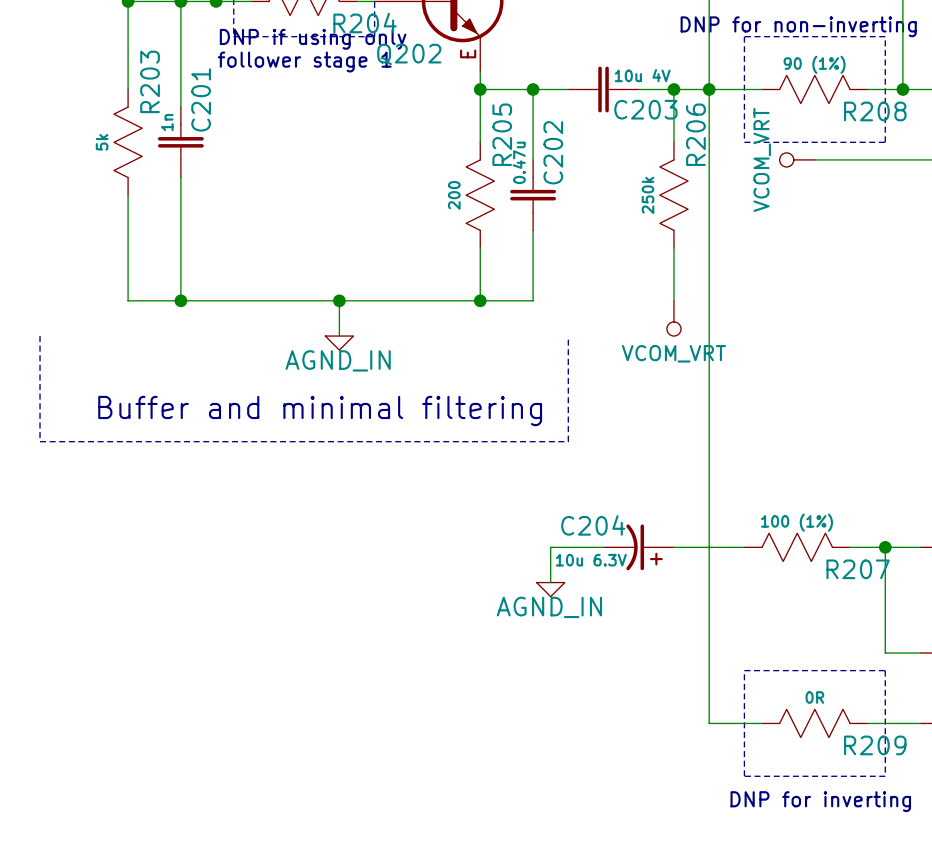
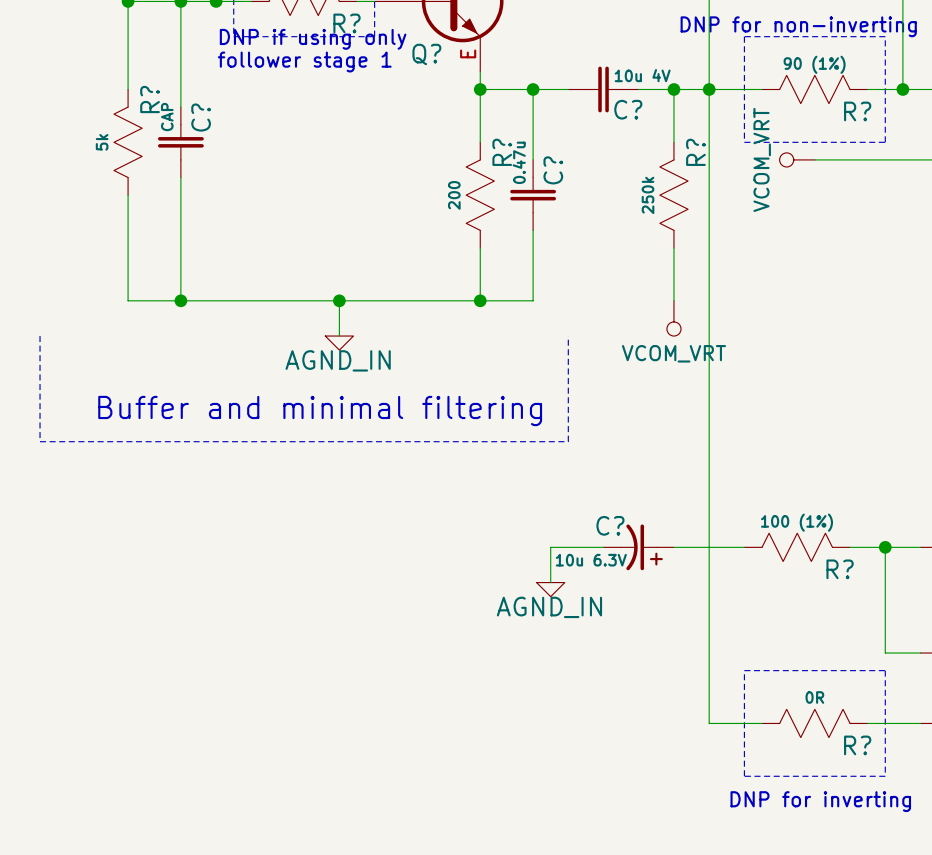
R204 name: R204 (365, 22) -> R? (346, 23)
Q202 name: Q202 (409, 54) -> Q? (426, 54)
R203 name: R203 (150, 81) -> R? (150, 99)
C201 name: C201 (201, 99) -> C? (201, 117)
C203 name: C203 (645, 109) -> C? (628, 109)
R208 name: R208 (875, 111) -> R? (857, 111)
C201 value: 1n (167, 122) -> CAP (167, 117)
R205 name: R205 (502, 134) -> R? (502, 152)
R206 name: R206 (695, 134) -> R? (695, 152)
C202 name: C202 (553, 152) -> C? (553, 170)
C204 name: C204 (593, 525) -> C? (610, 525)
R207 name: R207 (858, 569) -> R? (840, 569)
R209 name: R209 (875, 745) -> R? (857, 745)

